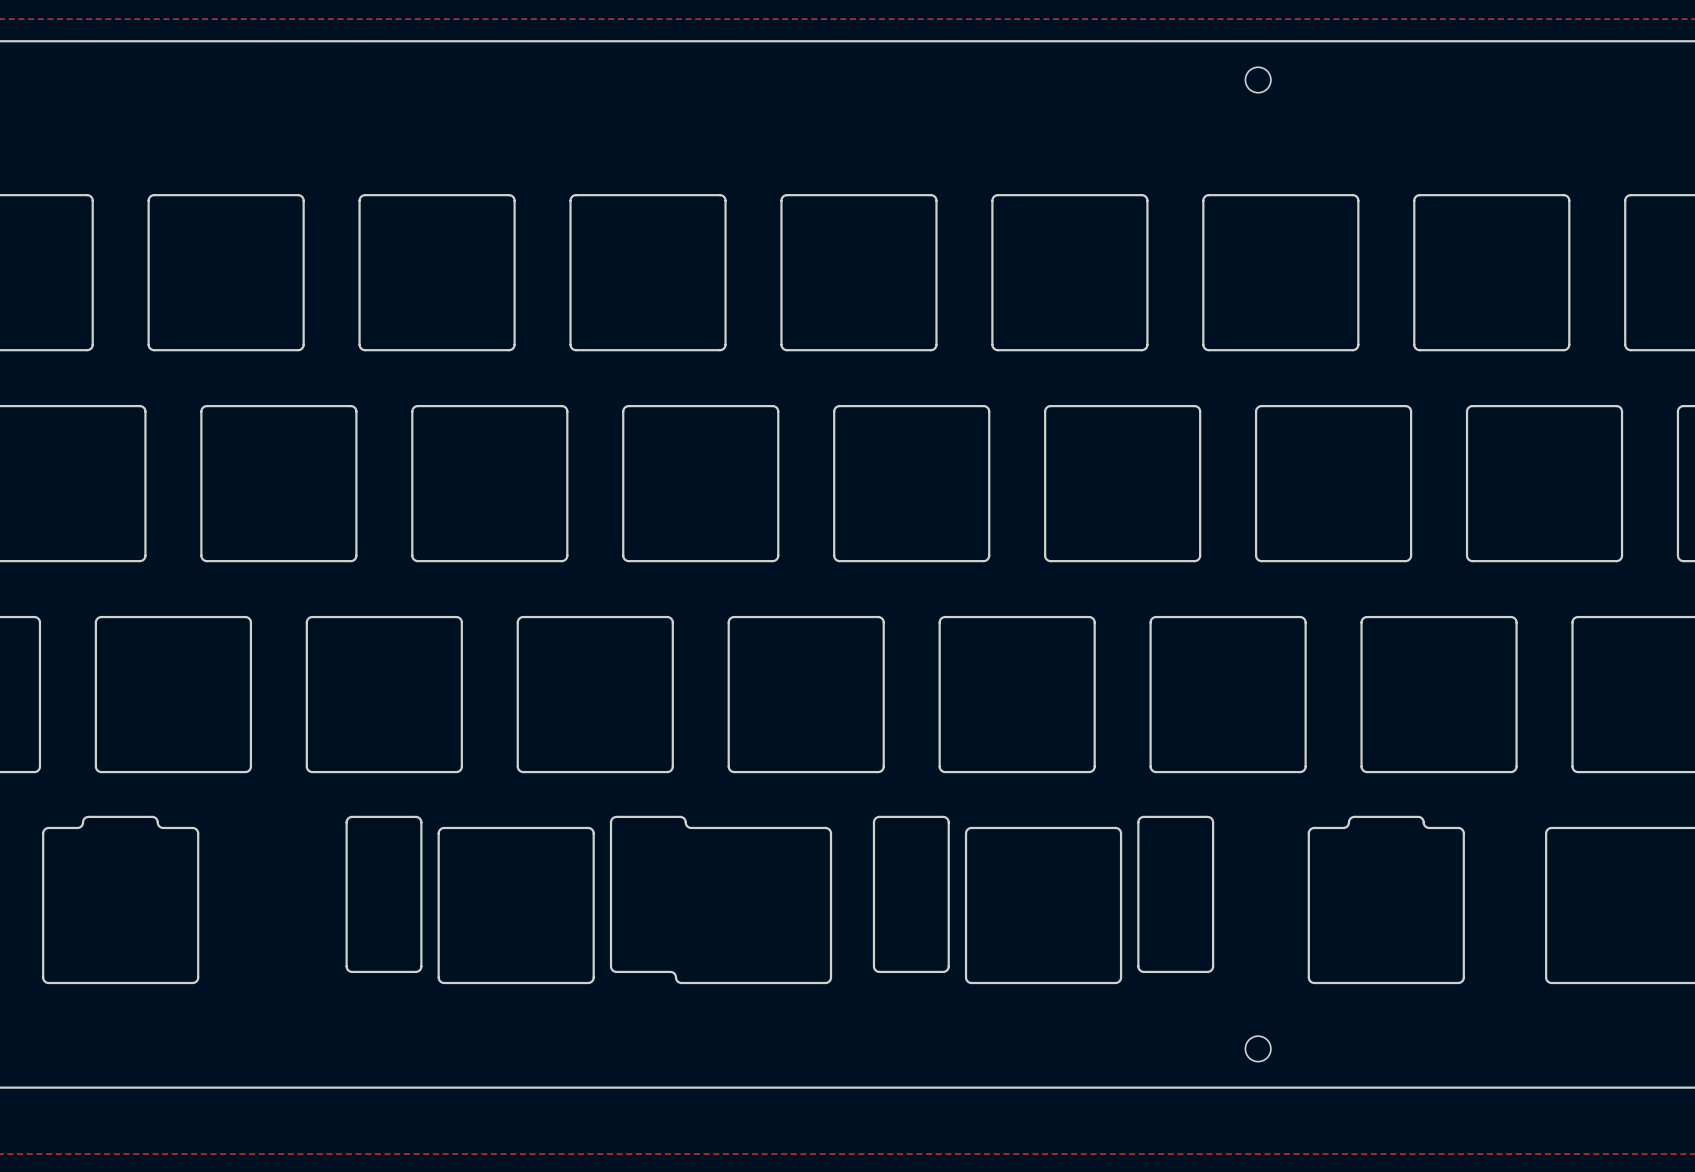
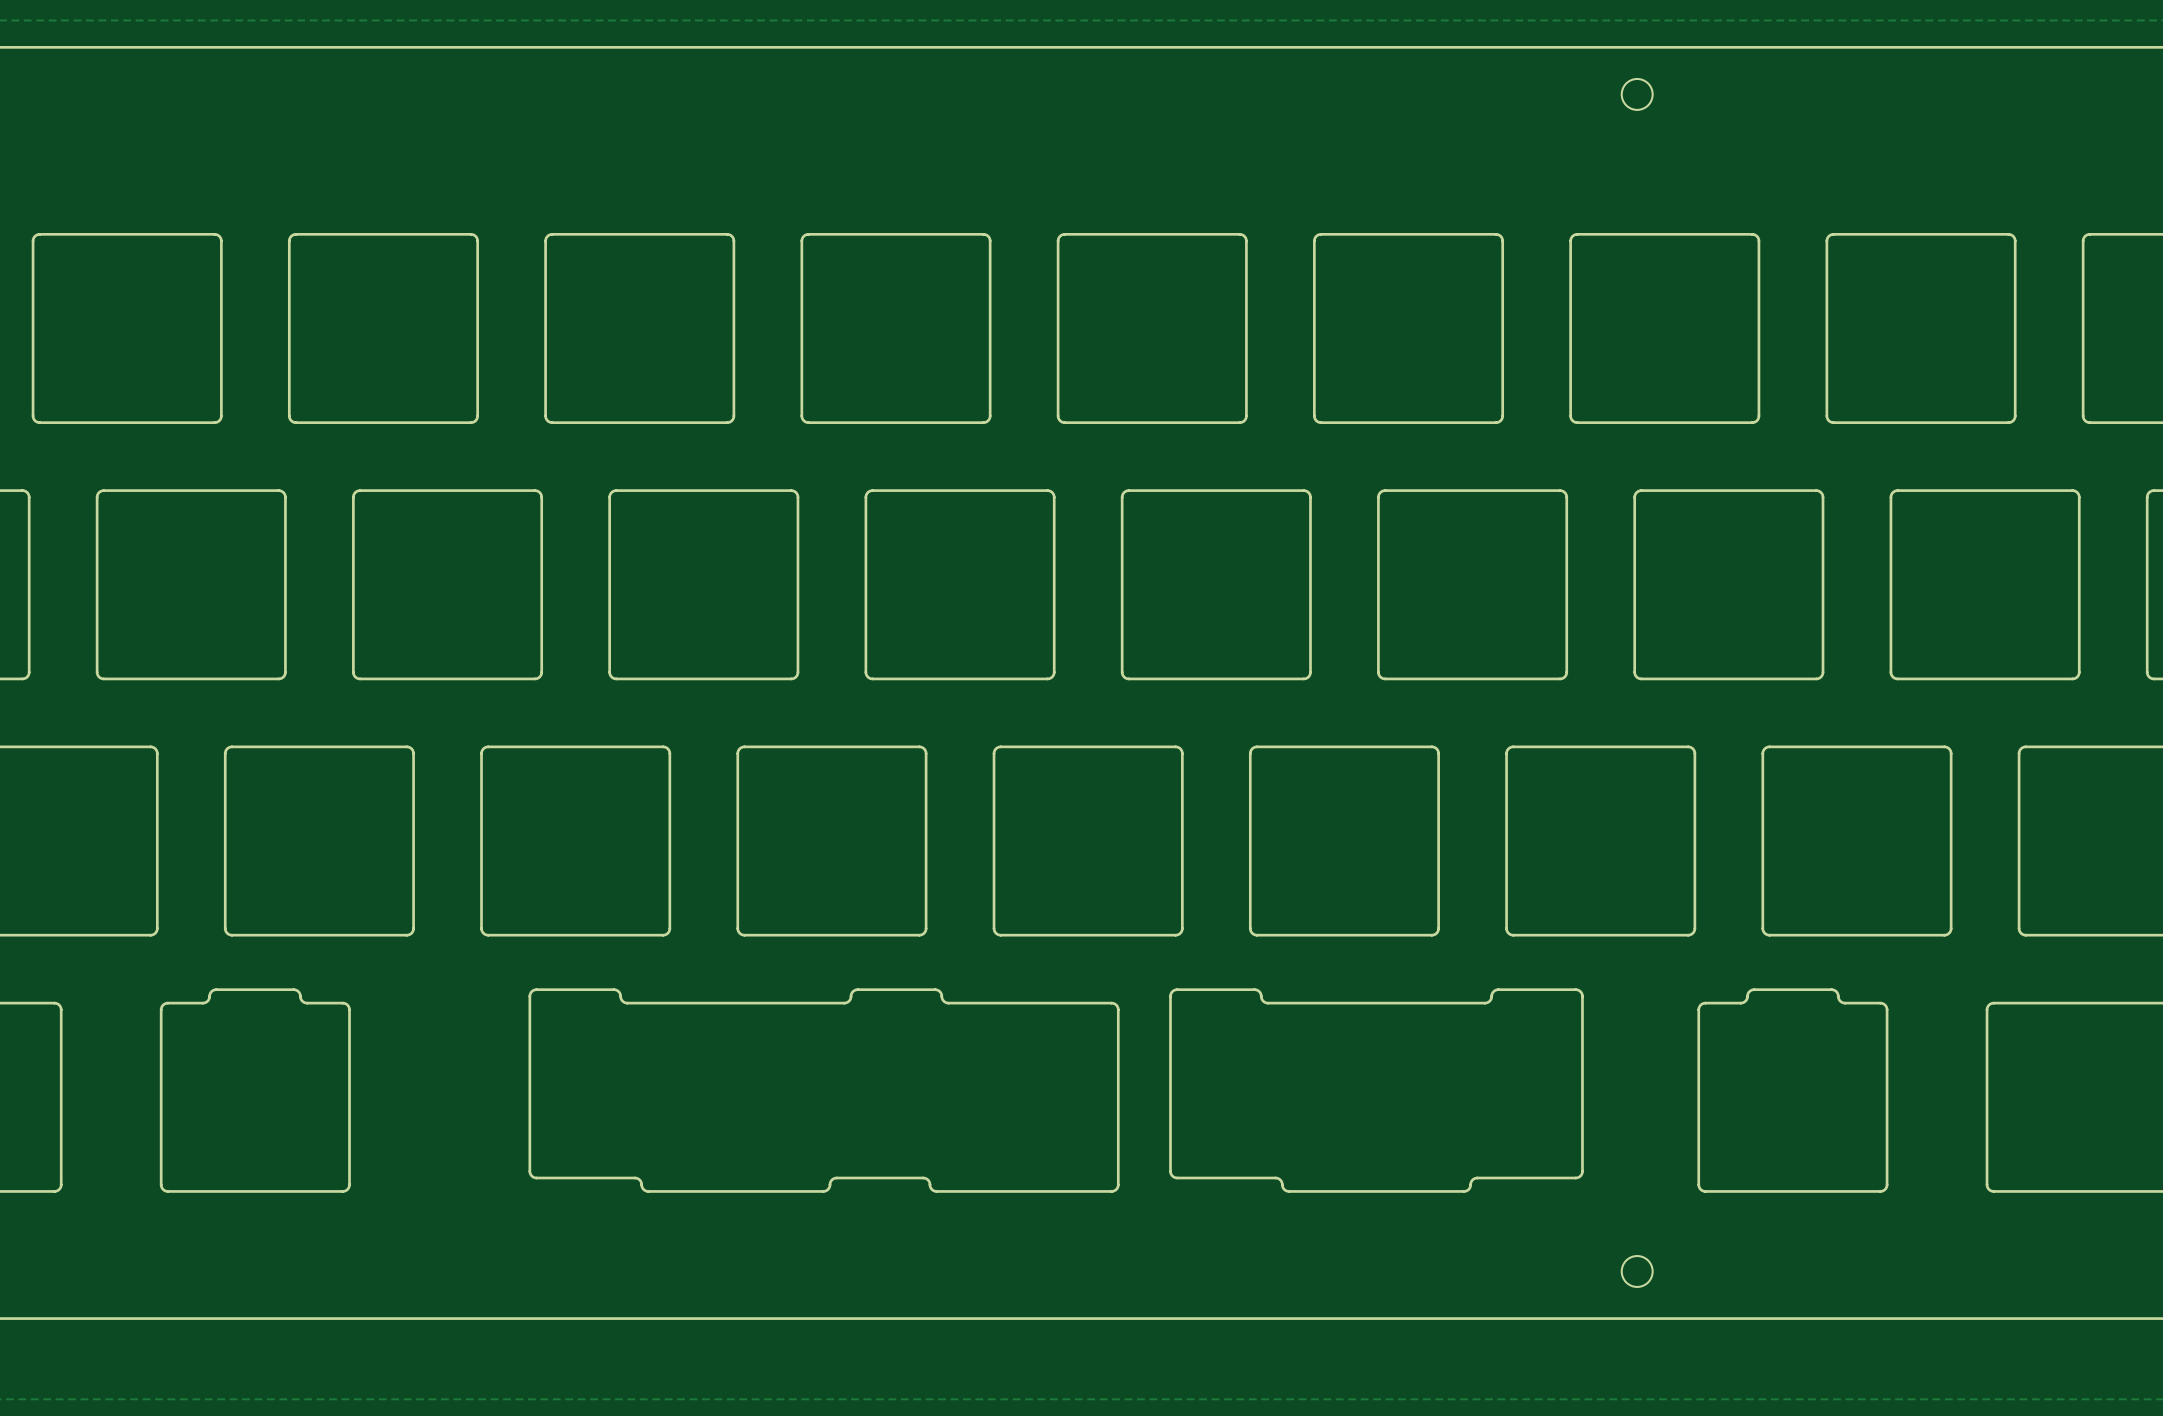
drawing shape: [42, 815, 1465, 985] -> [159, 988, 1889, 1193]

